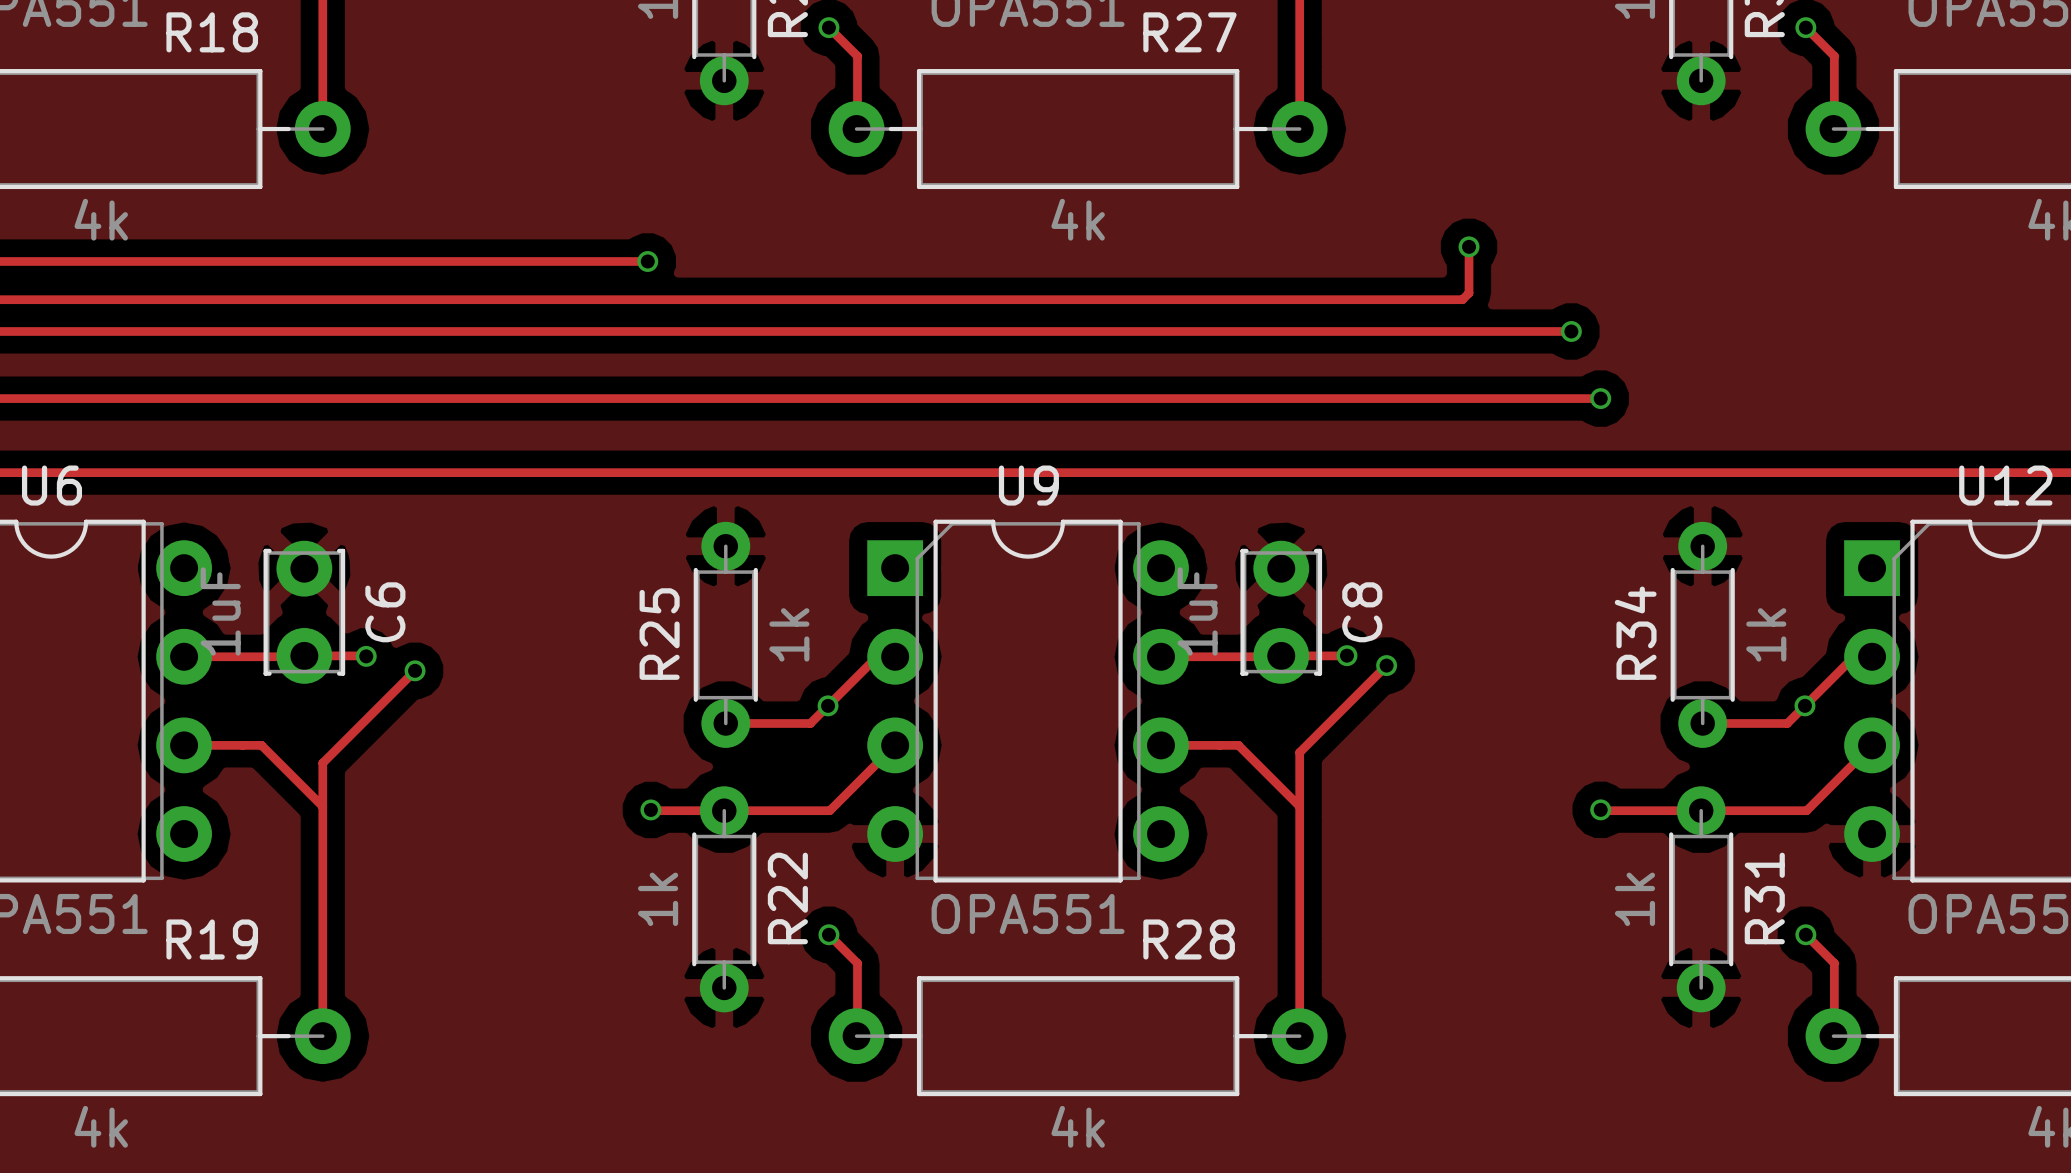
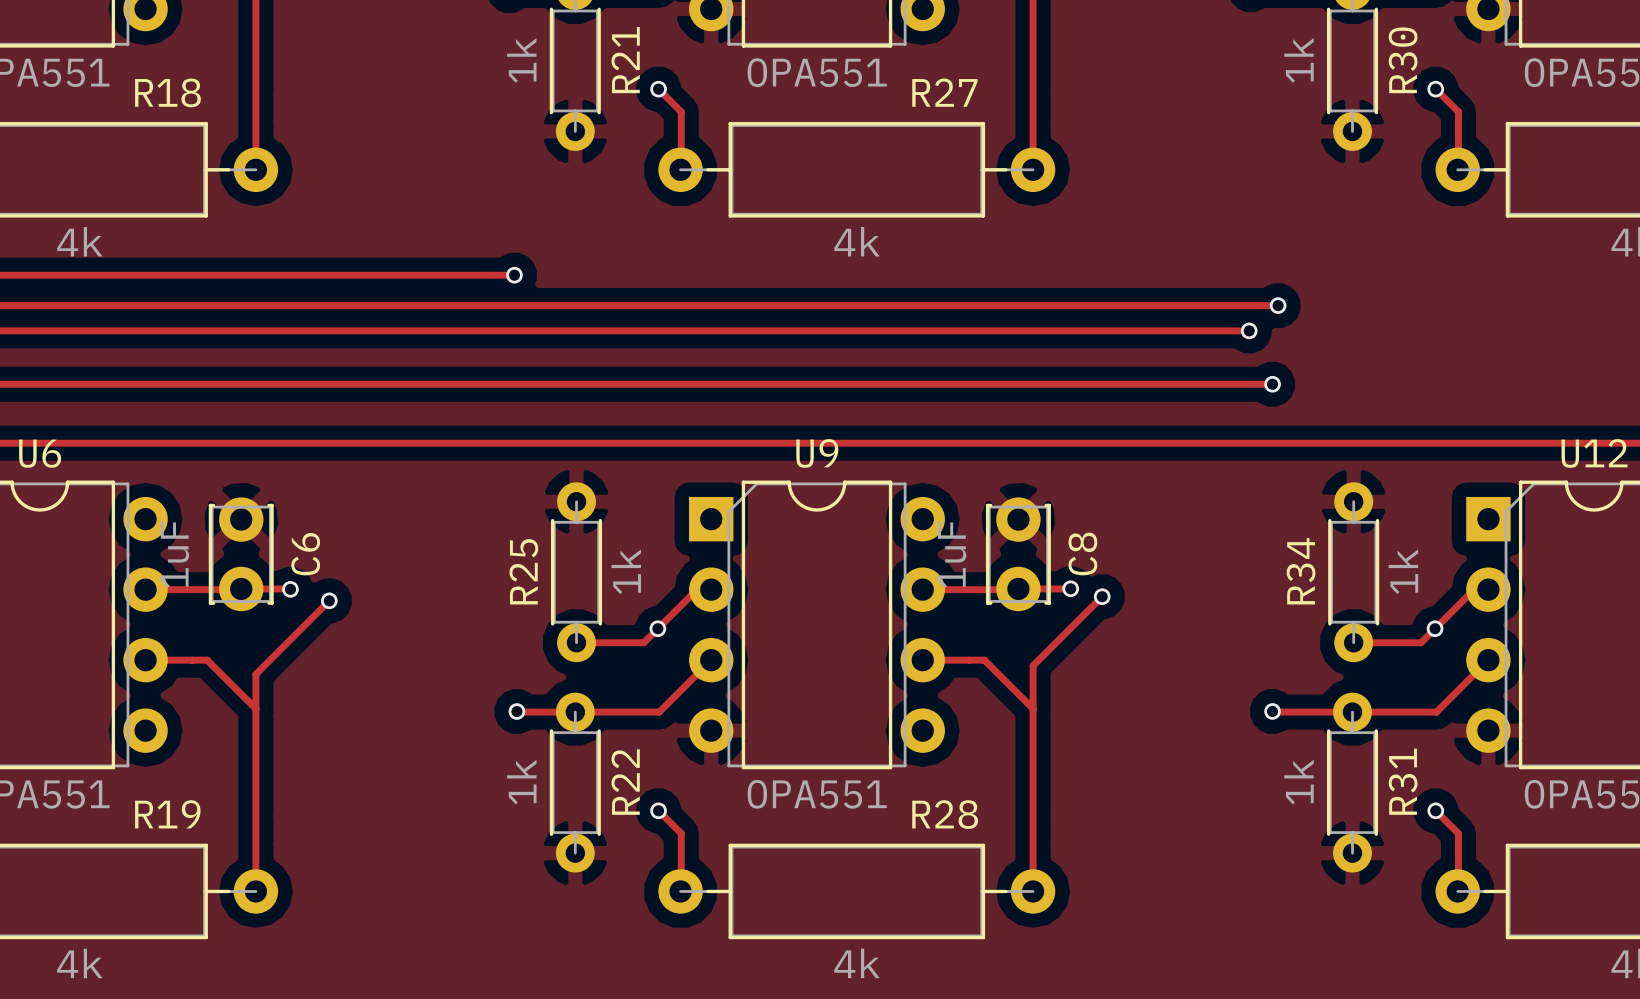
track: (1469, 246) (1469, 293) (1462, 299) -> (1278, 305) (1162, 305)
via position: (1469, 246) -> (1278, 305)

